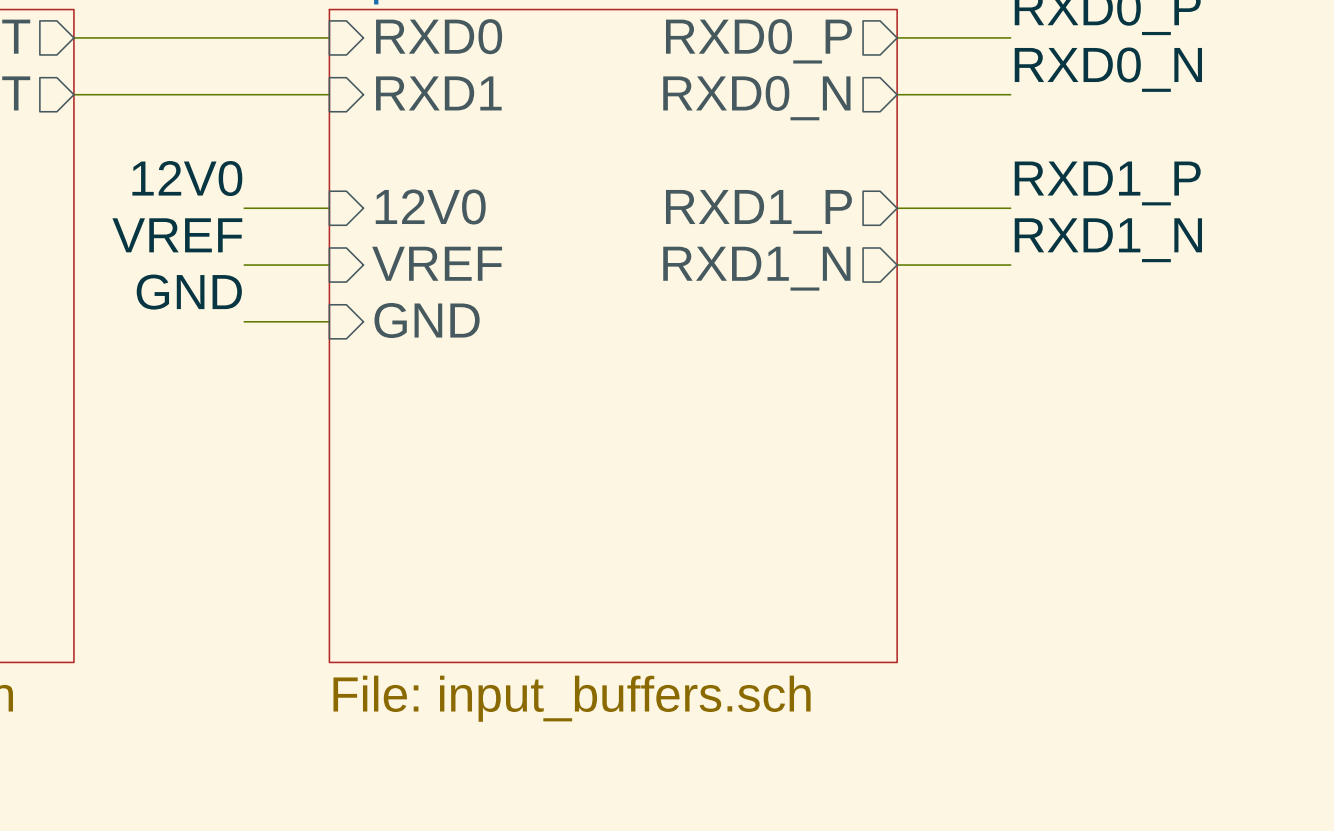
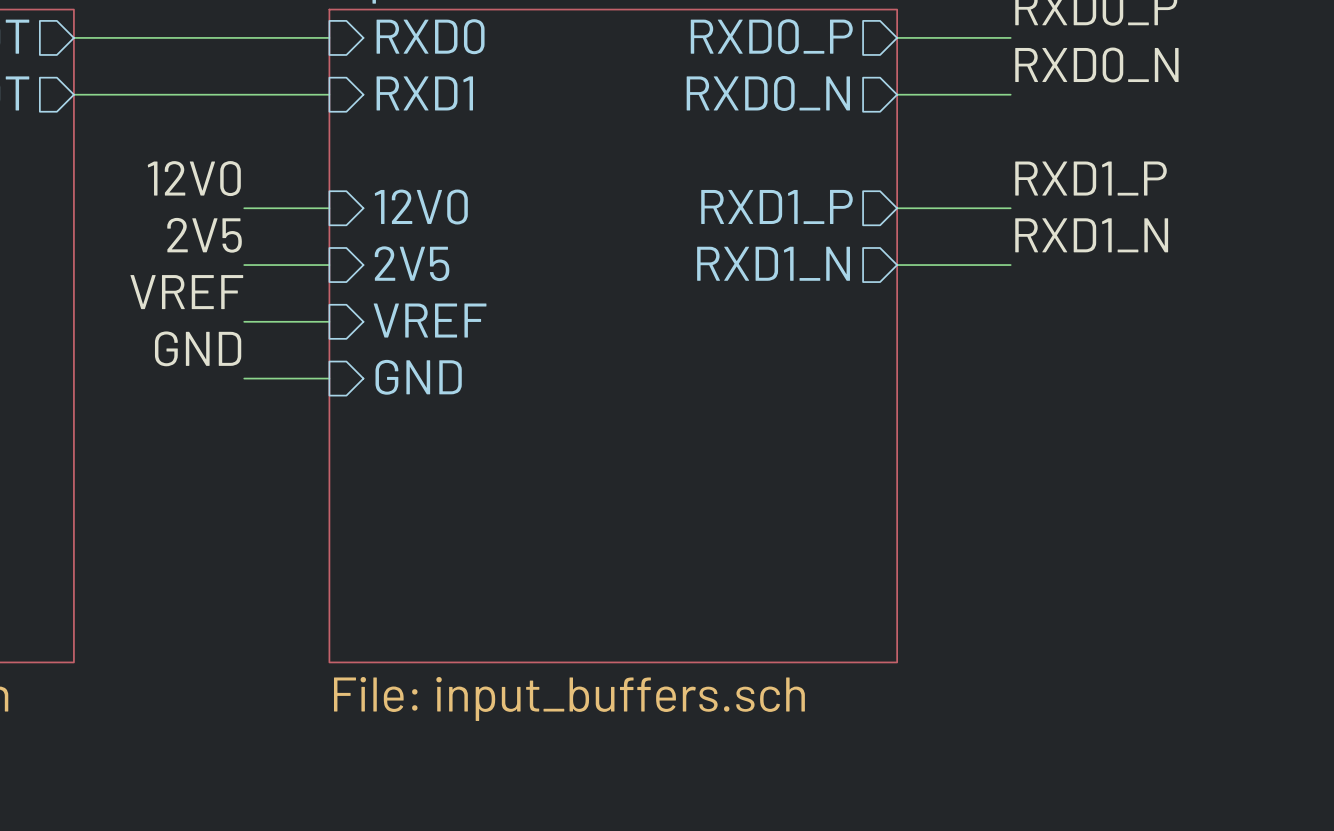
label: VREF (177, 235) -> 2V5 (204, 235)
sheet pin: VREF (437, 263) -> 2V5 (412, 263)
label: GND (189, 292) -> VREF (186, 292)
sheet pin: GND (427, 320) -> VREF (430, 320)
label: none -> GND (198, 348)
sheet pin: none -> GND (418, 377)
wire: none -> (244, 378) (329, 378)

